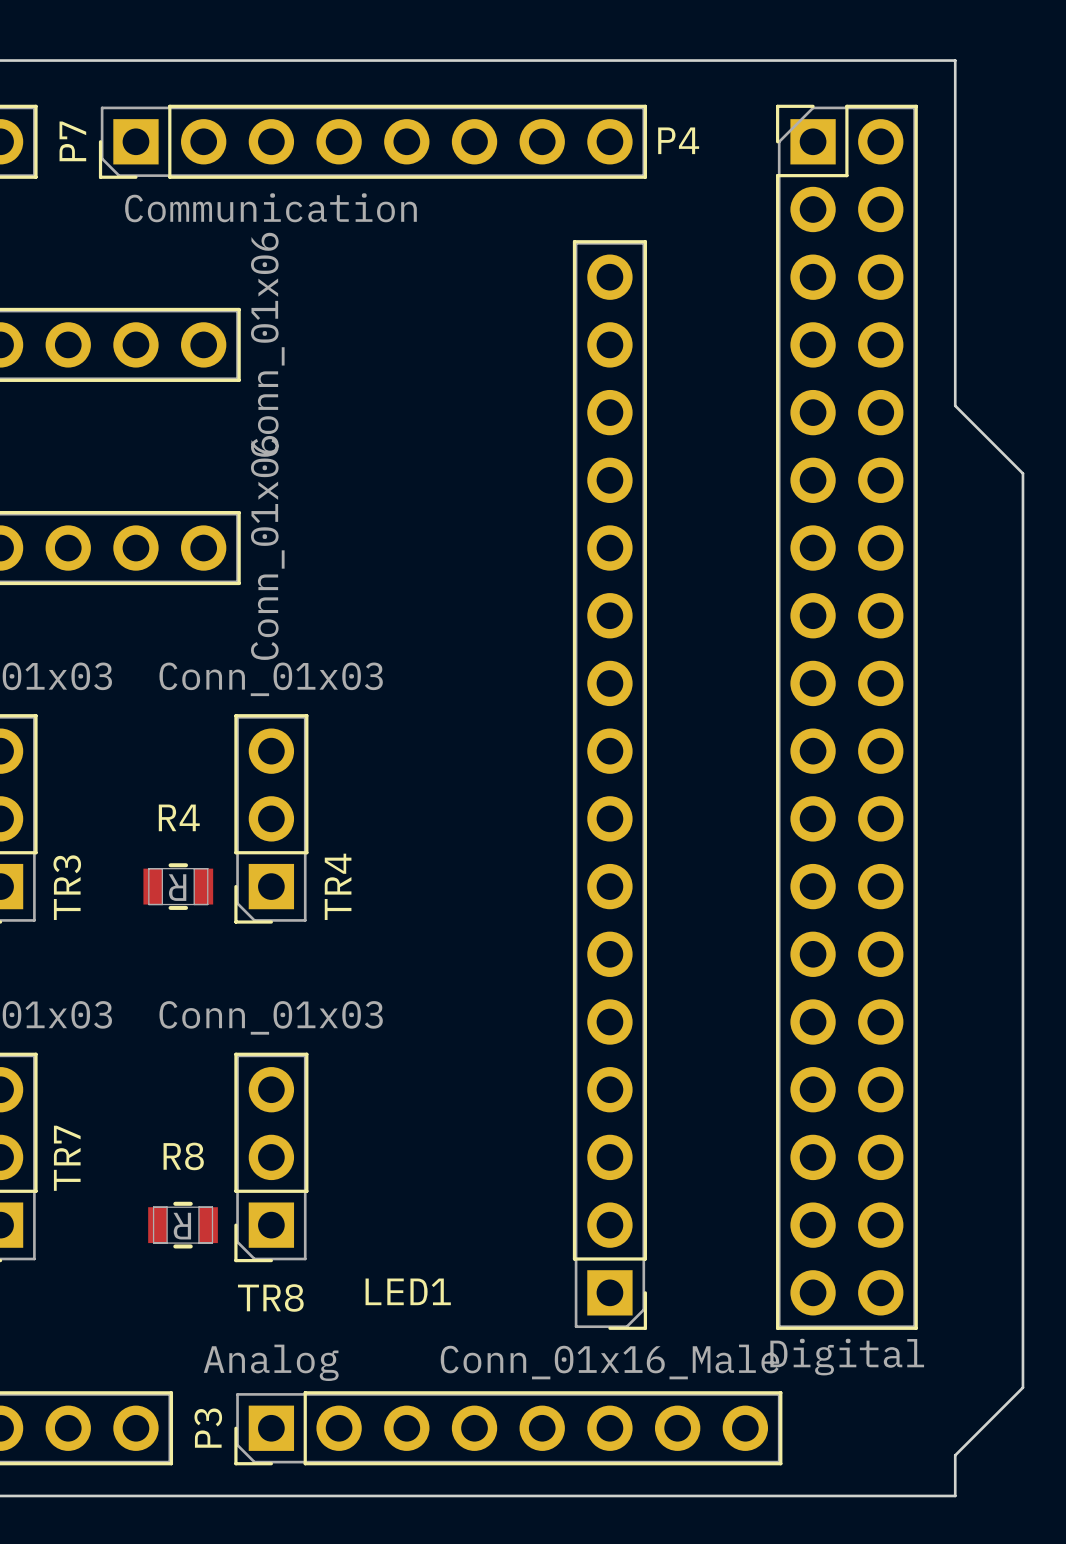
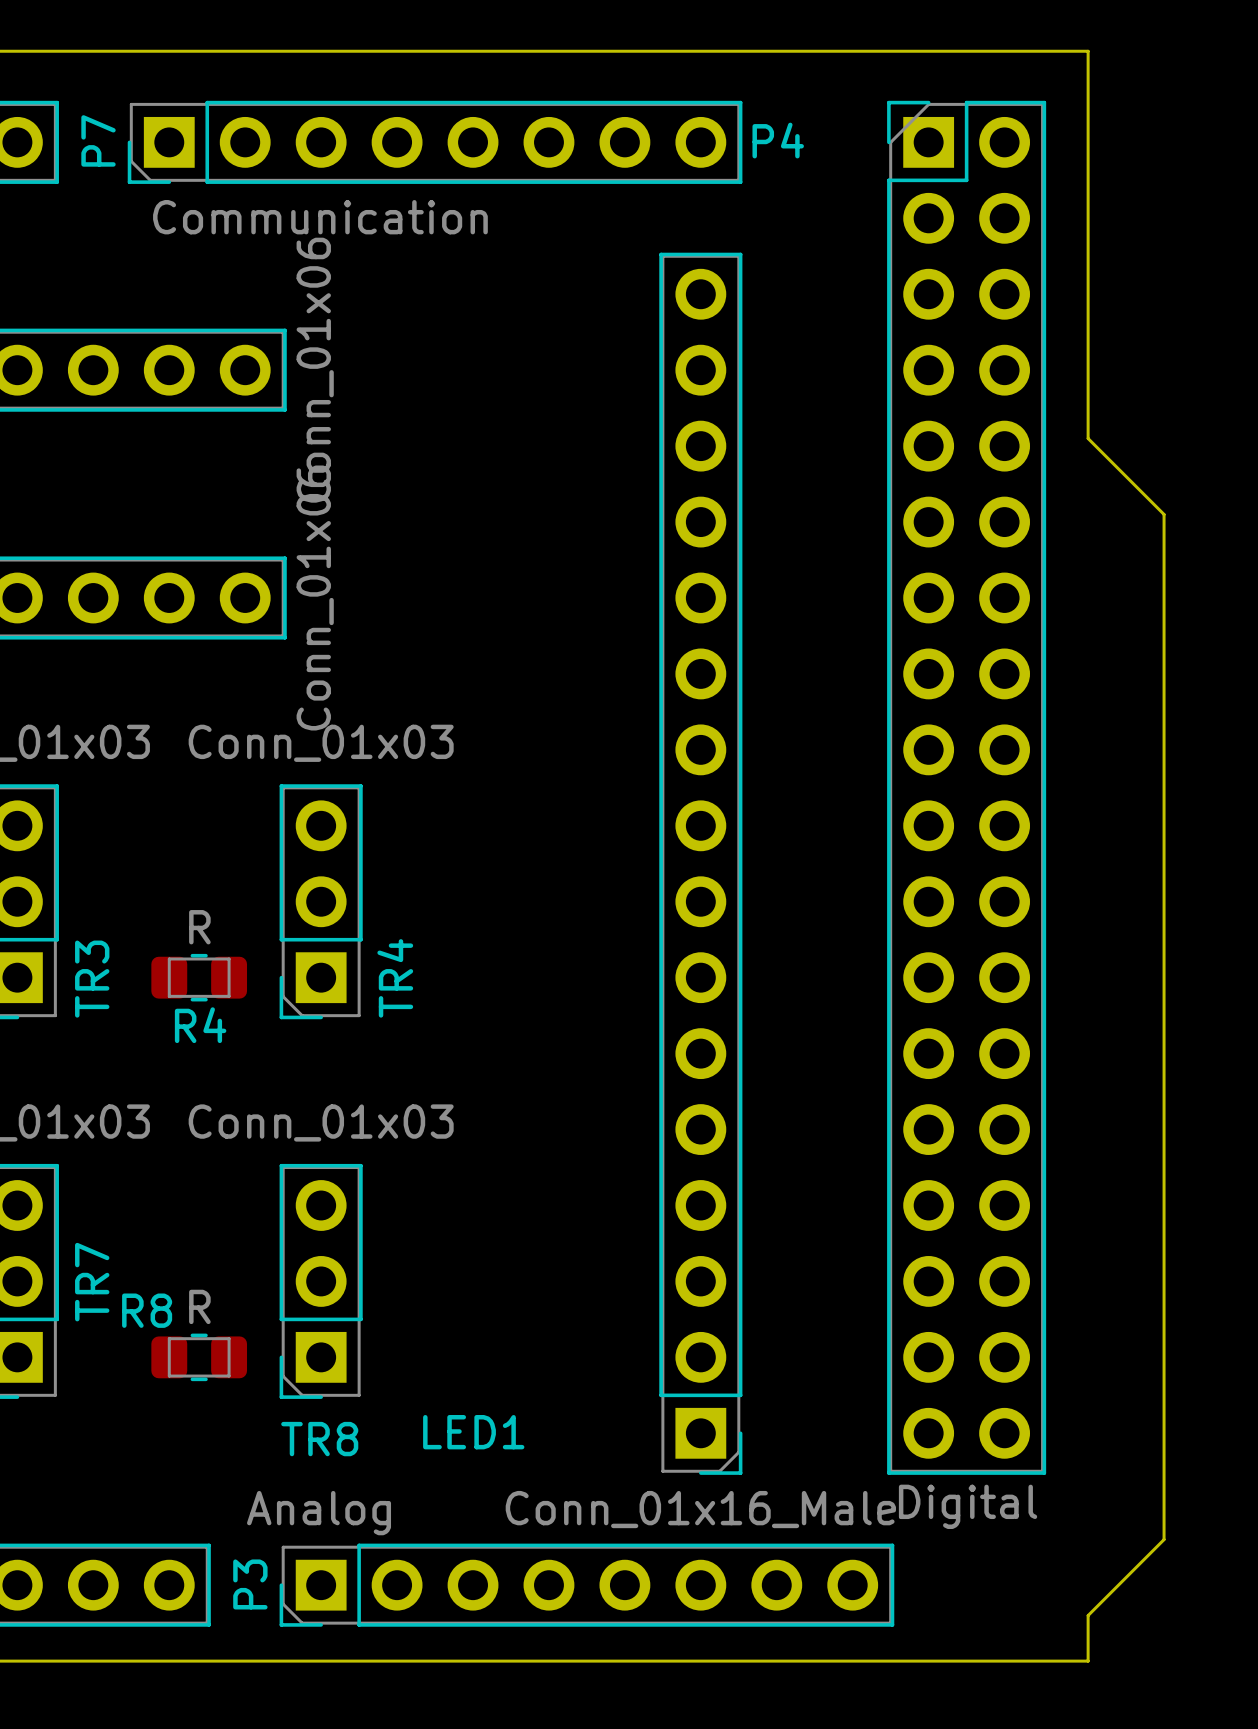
R4 name position: R4 (179, 817) -> R4 (200, 1025)
R4 footprint: [143, 863, 214, 910] -> [151, 953, 248, 1002]
R4 value rotation: 0° (177, 887) -> 180° (199, 927)
R8 name position: R8 (183, 1156) -> R8 (147, 1310)
R8 footprint: [148, 1201, 218, 1249] -> [151, 1333, 248, 1382]
R8 value rotation: 0° (182, 1226) -> 180° (199, 1306)

